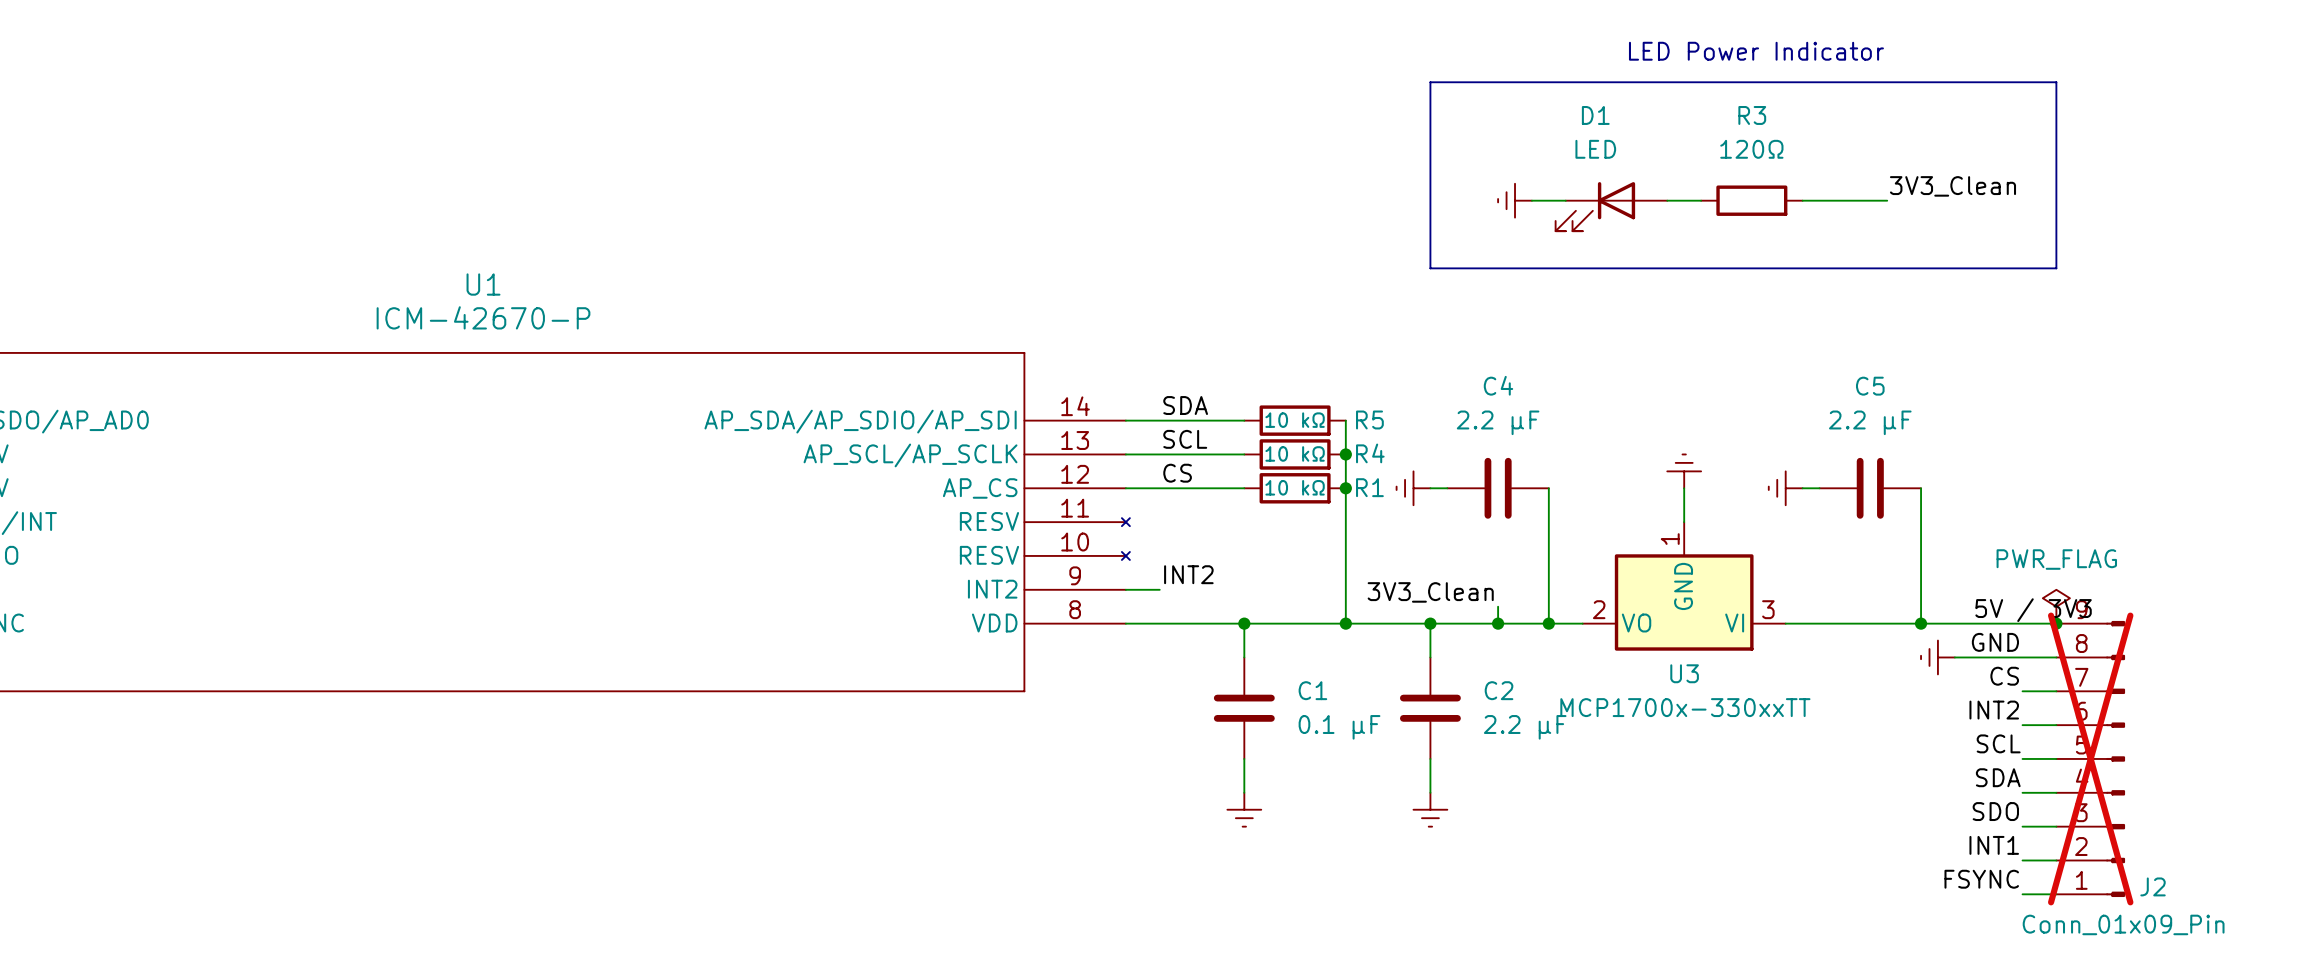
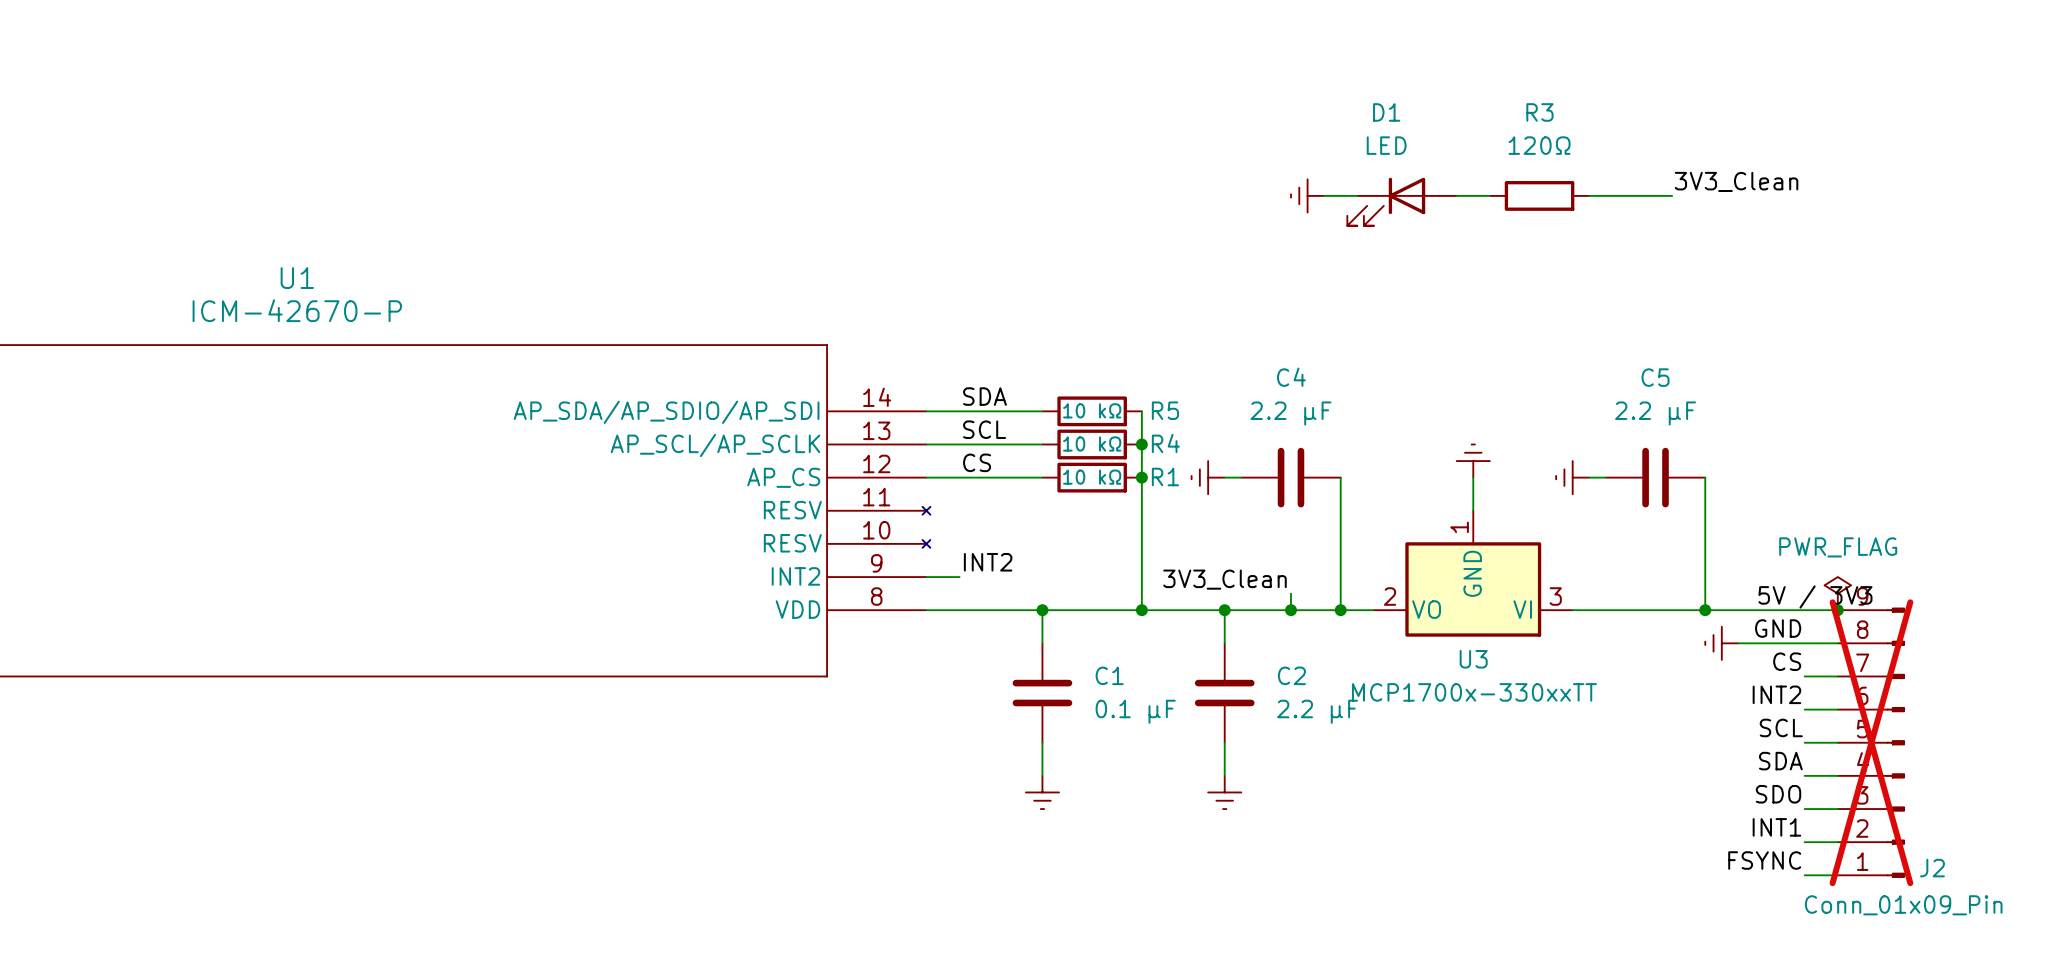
text: LED Power Indicator (1756, 51) -> none
line: (1430, 82) (2056, 82) (2056, 268) (1430, 268) (1430, 82) -> none

